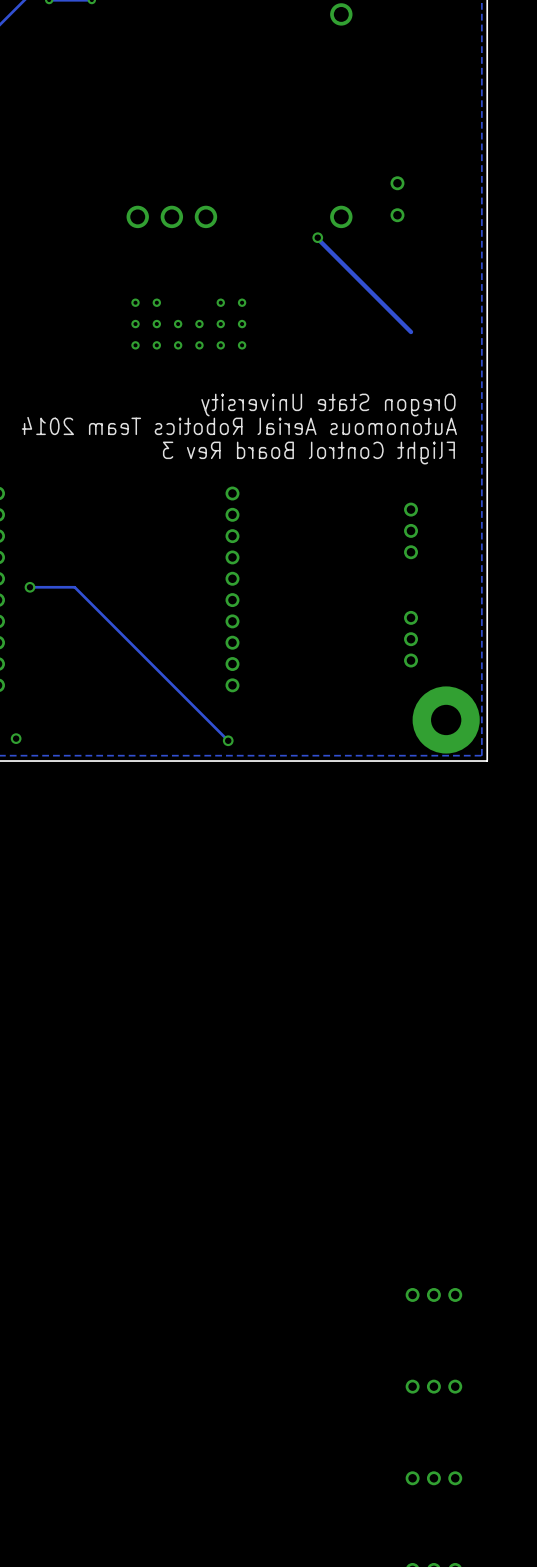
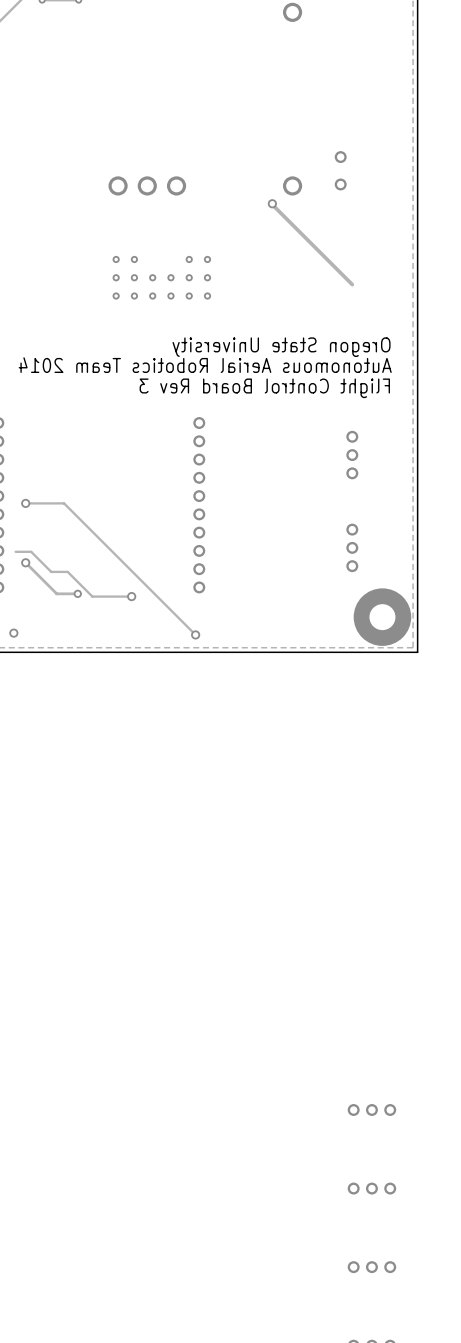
track: none -> (15, 551) (31, 551) (51, 571) (67, 571) (92, 596) (131, 596)
track: none -> (25, 562) (56, 593) (77, 593)
via: none -> (25, 562)
via: none -> (77, 593)
via: none -> (131, 596)

